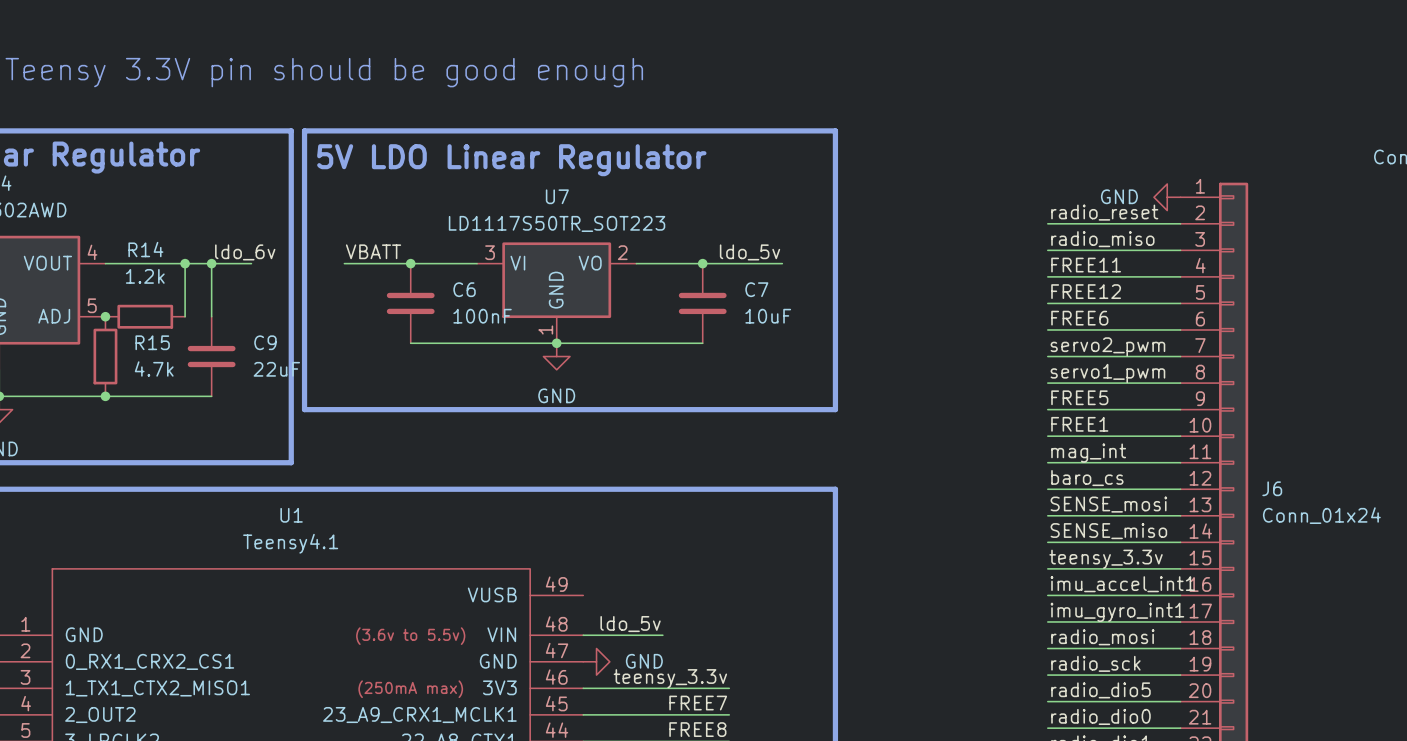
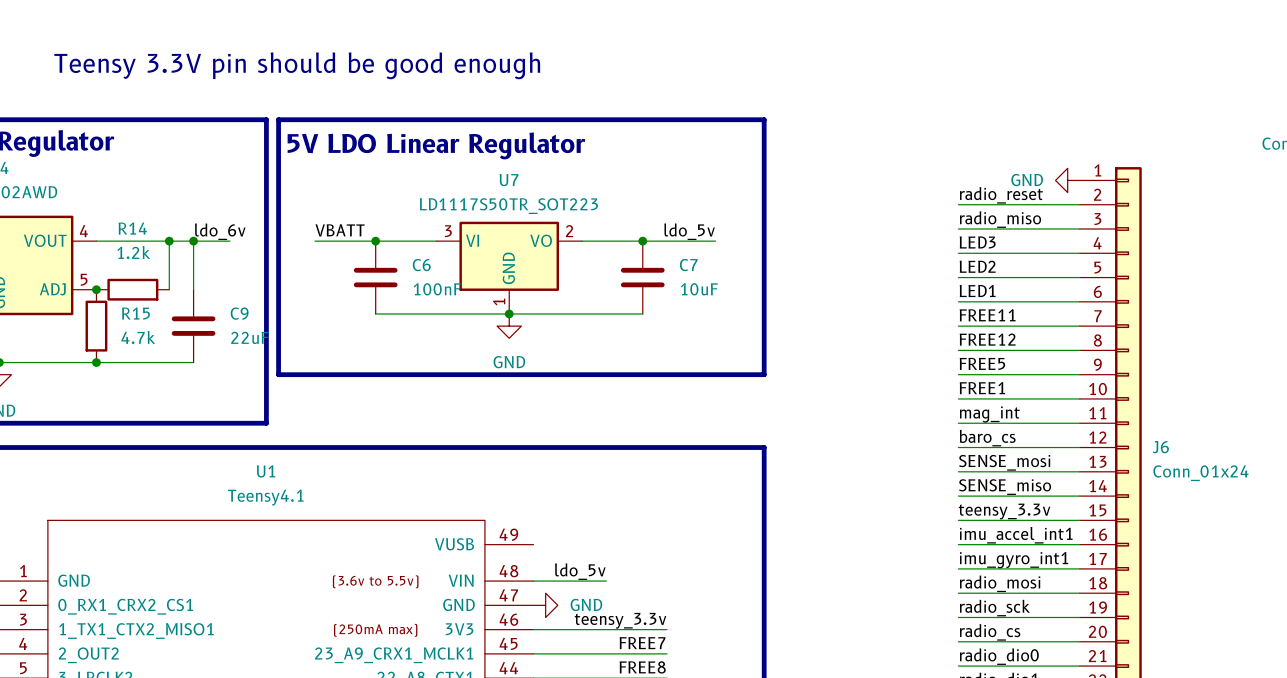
label: FREE11 (1086, 265) -> LED3 (977, 242)
label: FREE12 (1086, 291) -> LED2 (977, 266)
label: FREE6 (1079, 318) -> LED1 (977, 291)
label: servo2_pwm (1107, 346) -> FREE11 (987, 315)
label: servo1_pwm (1107, 373) -> FREE12 (987, 339)
label: radio_dio5 (1100, 690) -> radio_cs (990, 632)

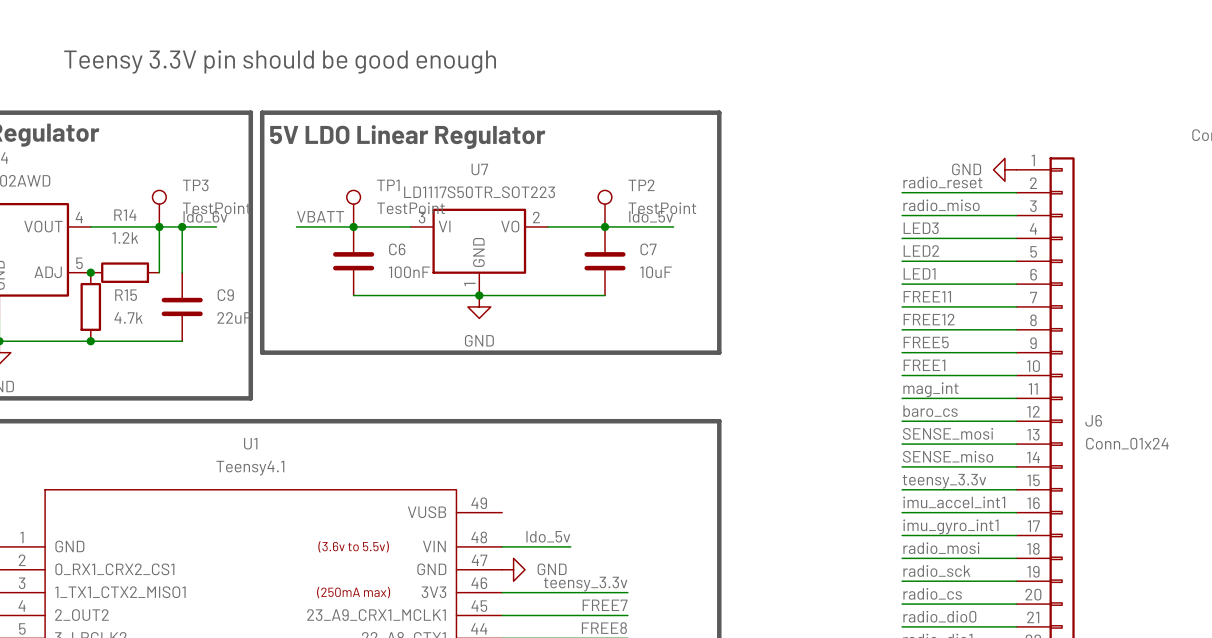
TP3: none -> TestPoint (159, 208)
TP1: none -> TestPoint (353, 208)
TP2: none -> TestPoint (605, 208)

